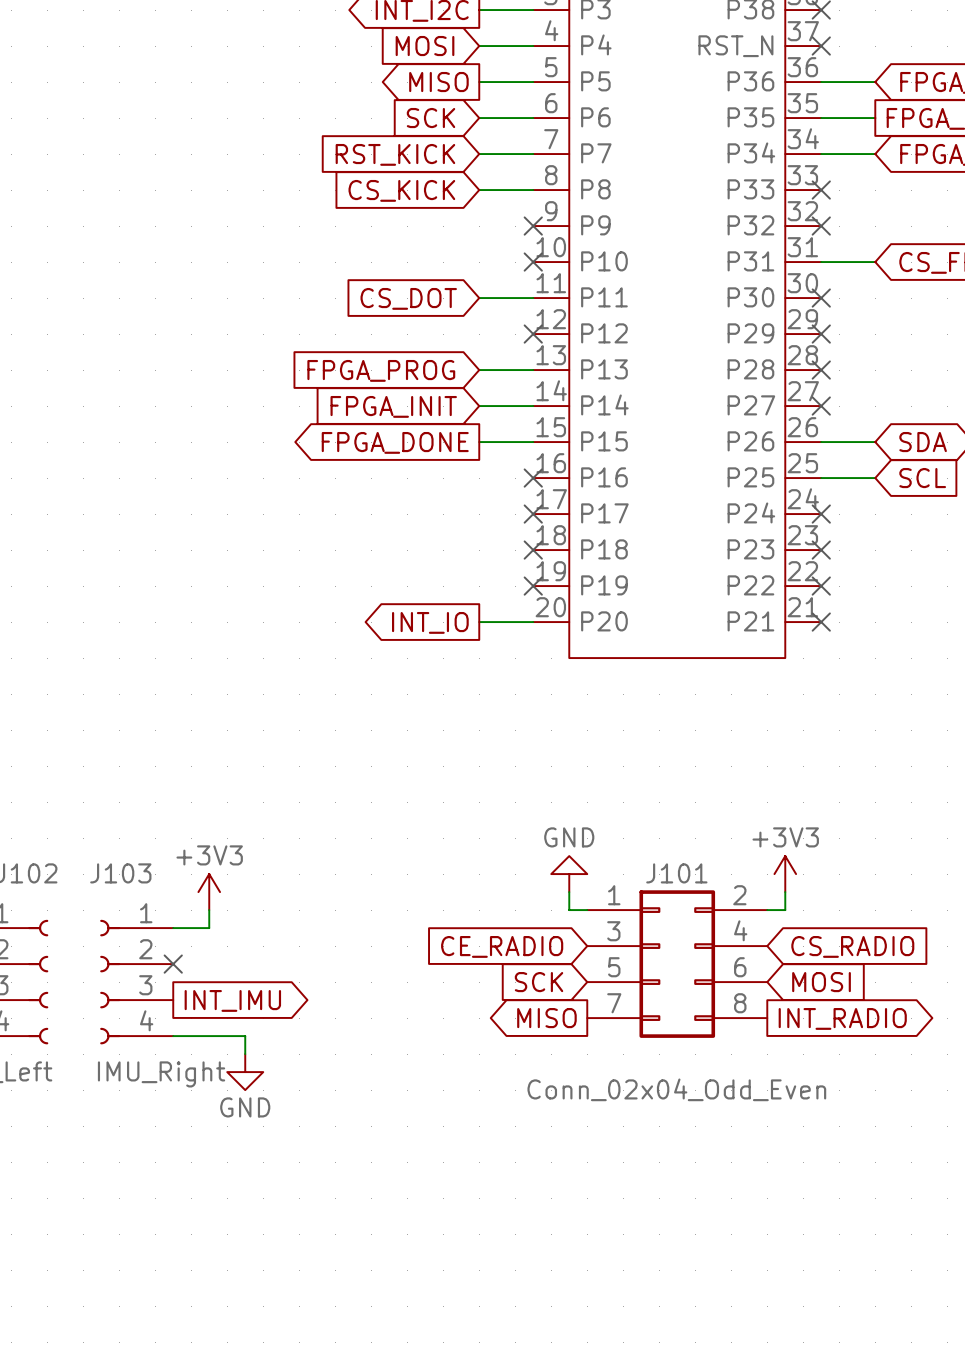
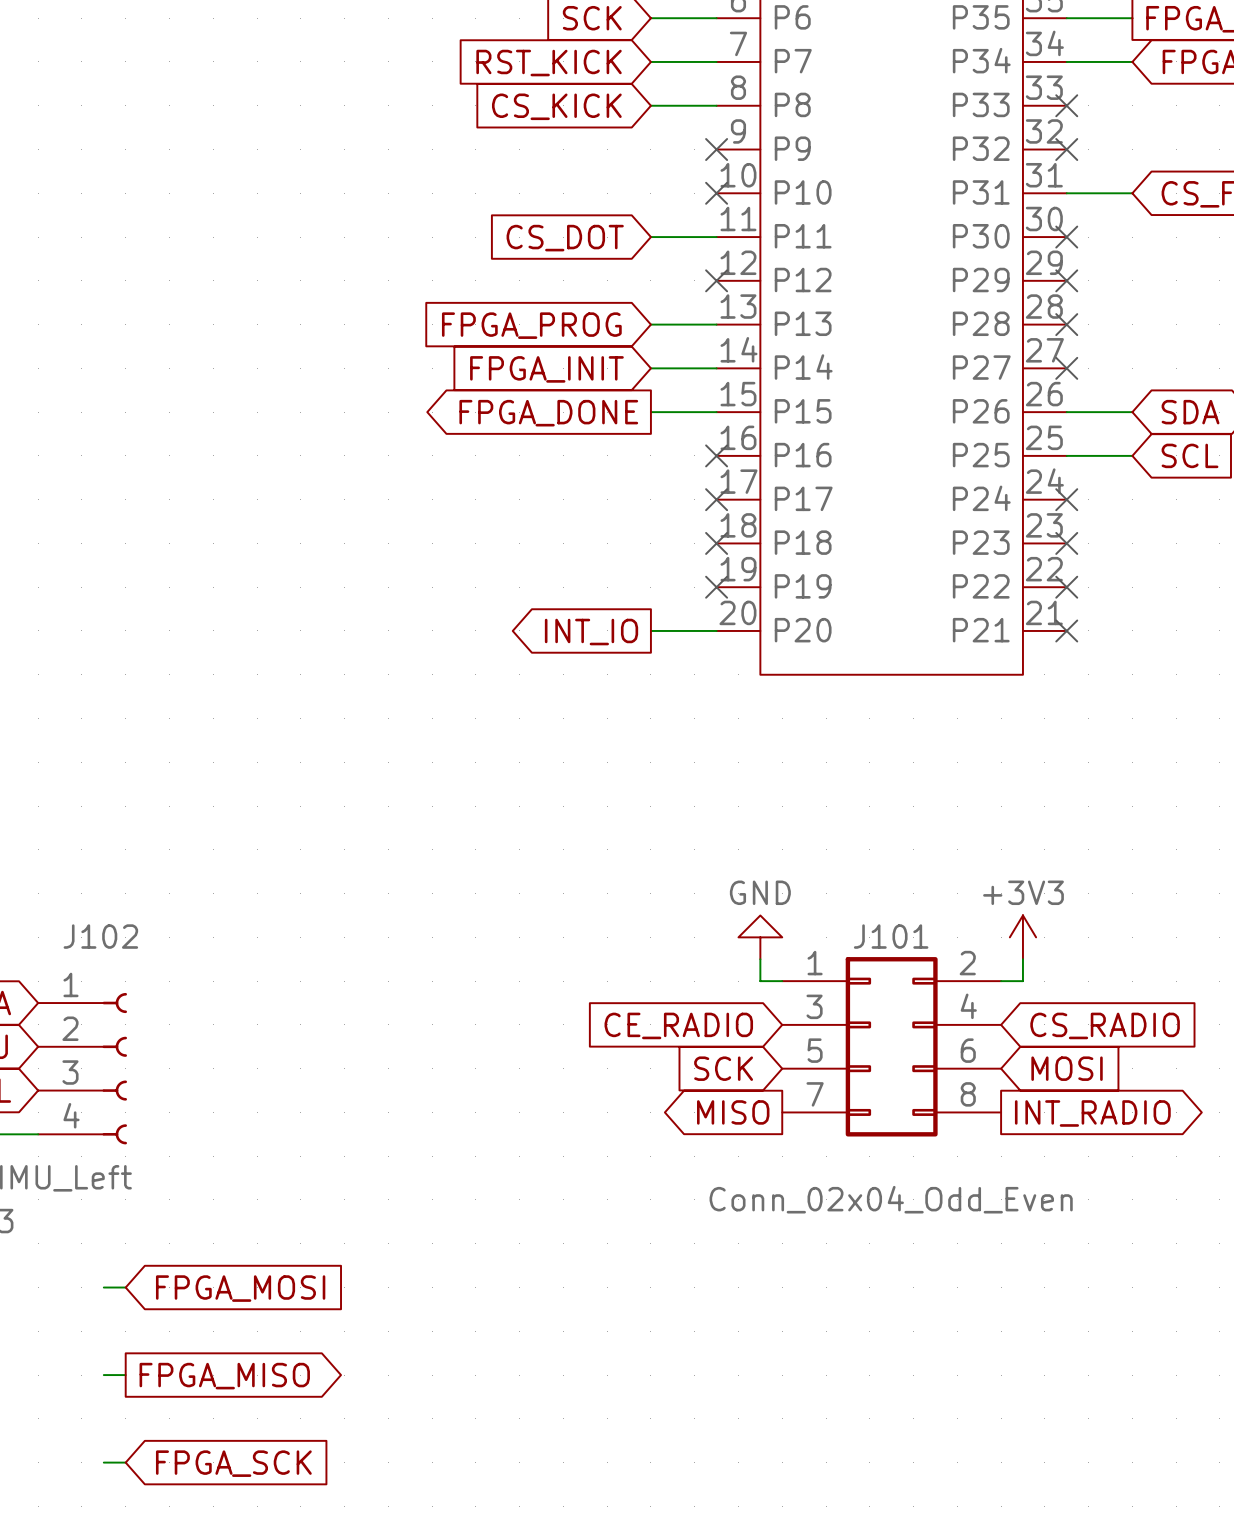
power symbol: +3V3 (209, 892) -> none
wire: (209, 910) (209, 928) (173, 928) -> none
no-connect mark: (173, 964) -> none
J103: IMU_Right (136, 982) -> none
global label: INT_IMU (232, 1000) -> none
wire: (173, 1036) (245, 1036) (245, 1054) -> none
power symbol: GND (245, 1072) -> none
wire: none -> (103, 1287) (125, 1287)
global label: none -> FPGA_MOSI (240, 1288)
wire: none -> (103, 1375) (125, 1375)
global label: none -> FPGA_MISO (224, 1376)
wire: none -> (103, 1462) (125, 1462)
global label: none -> FPGA_SCK (233, 1463)

